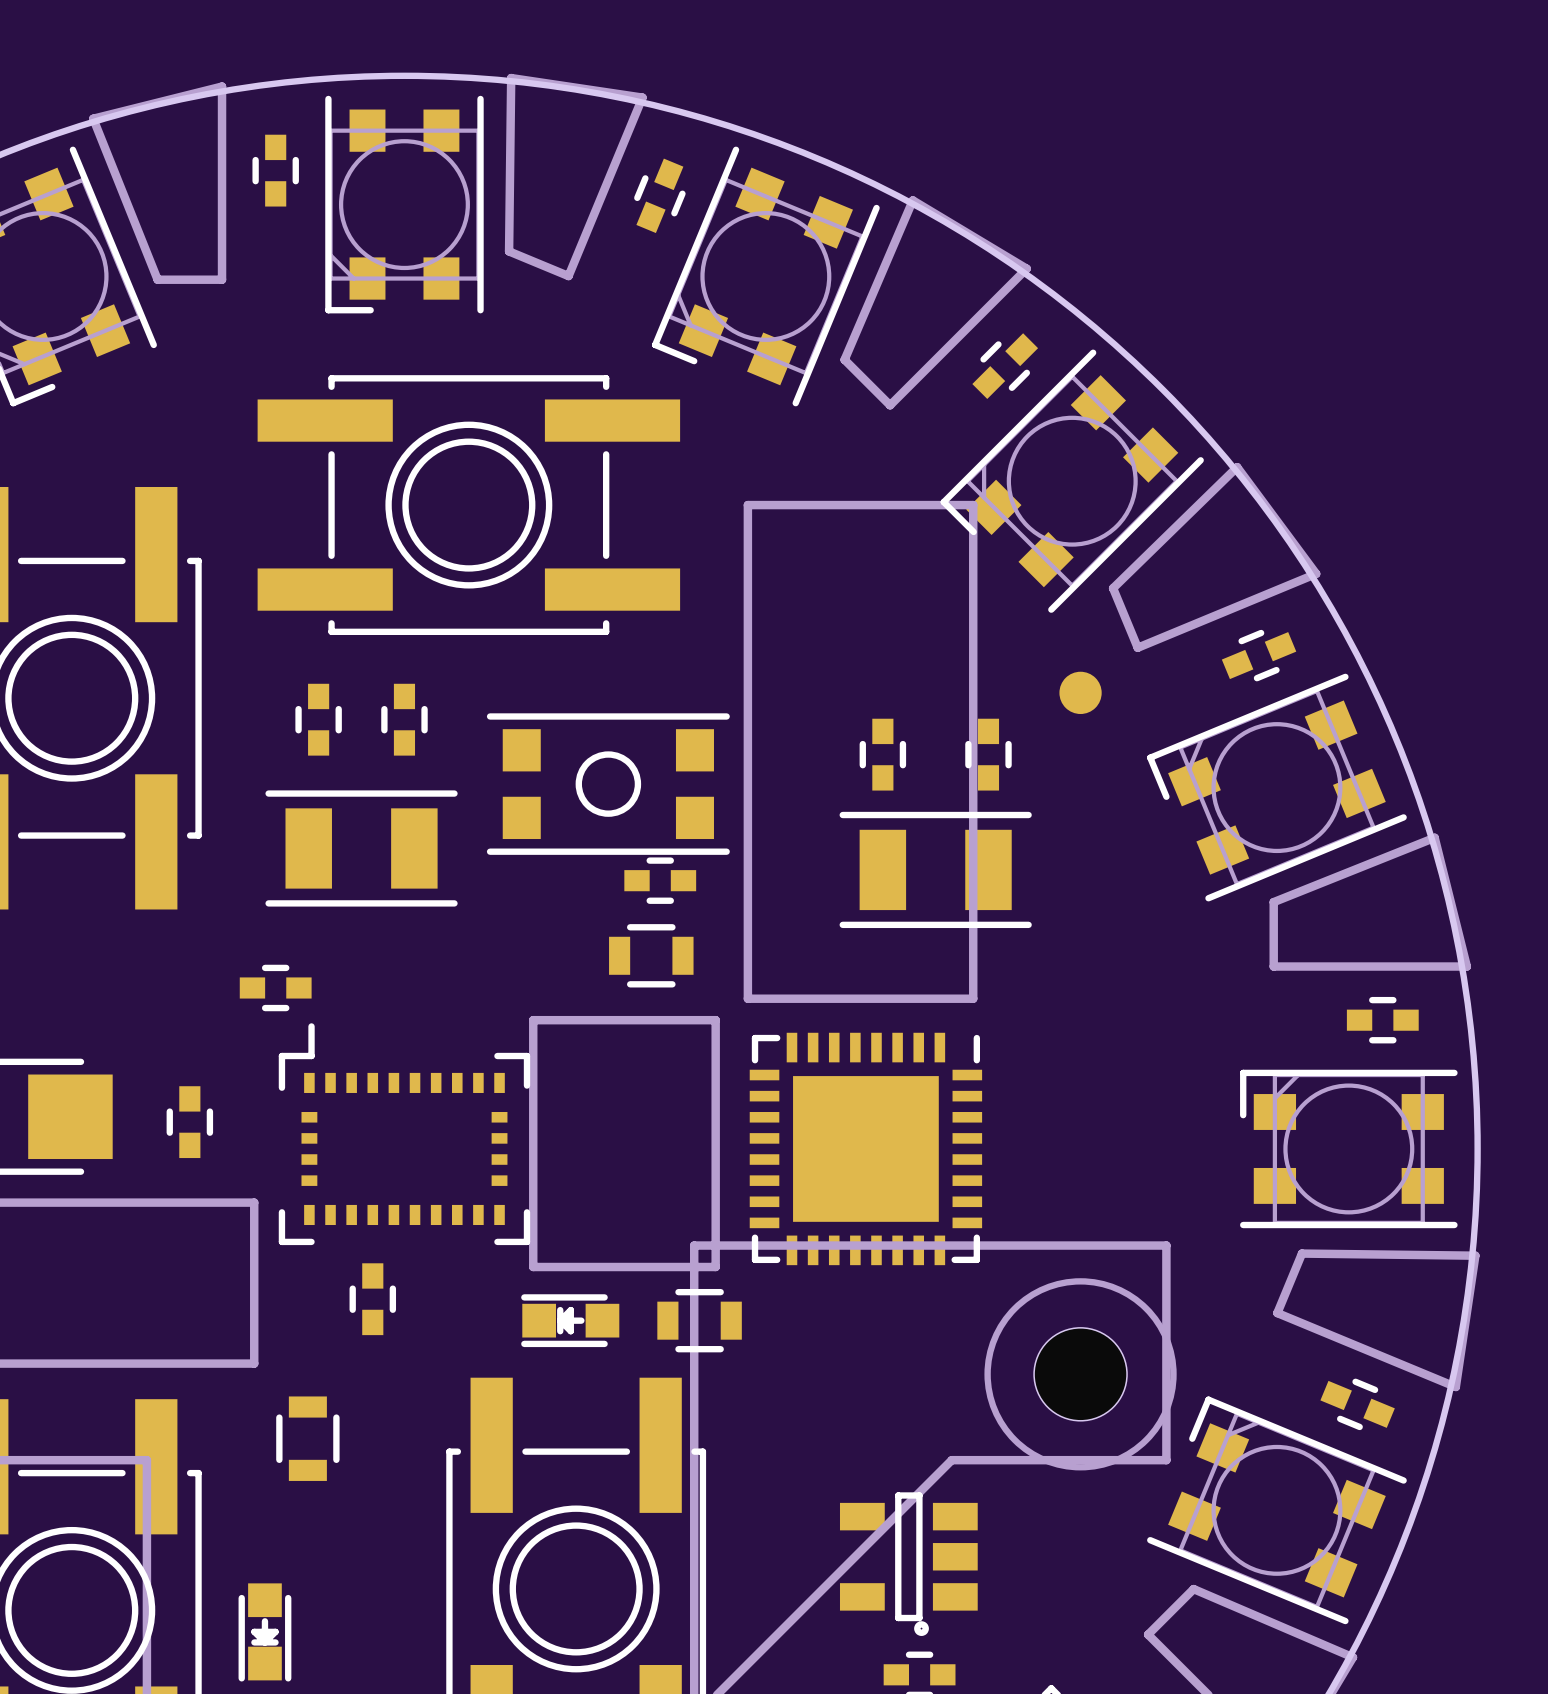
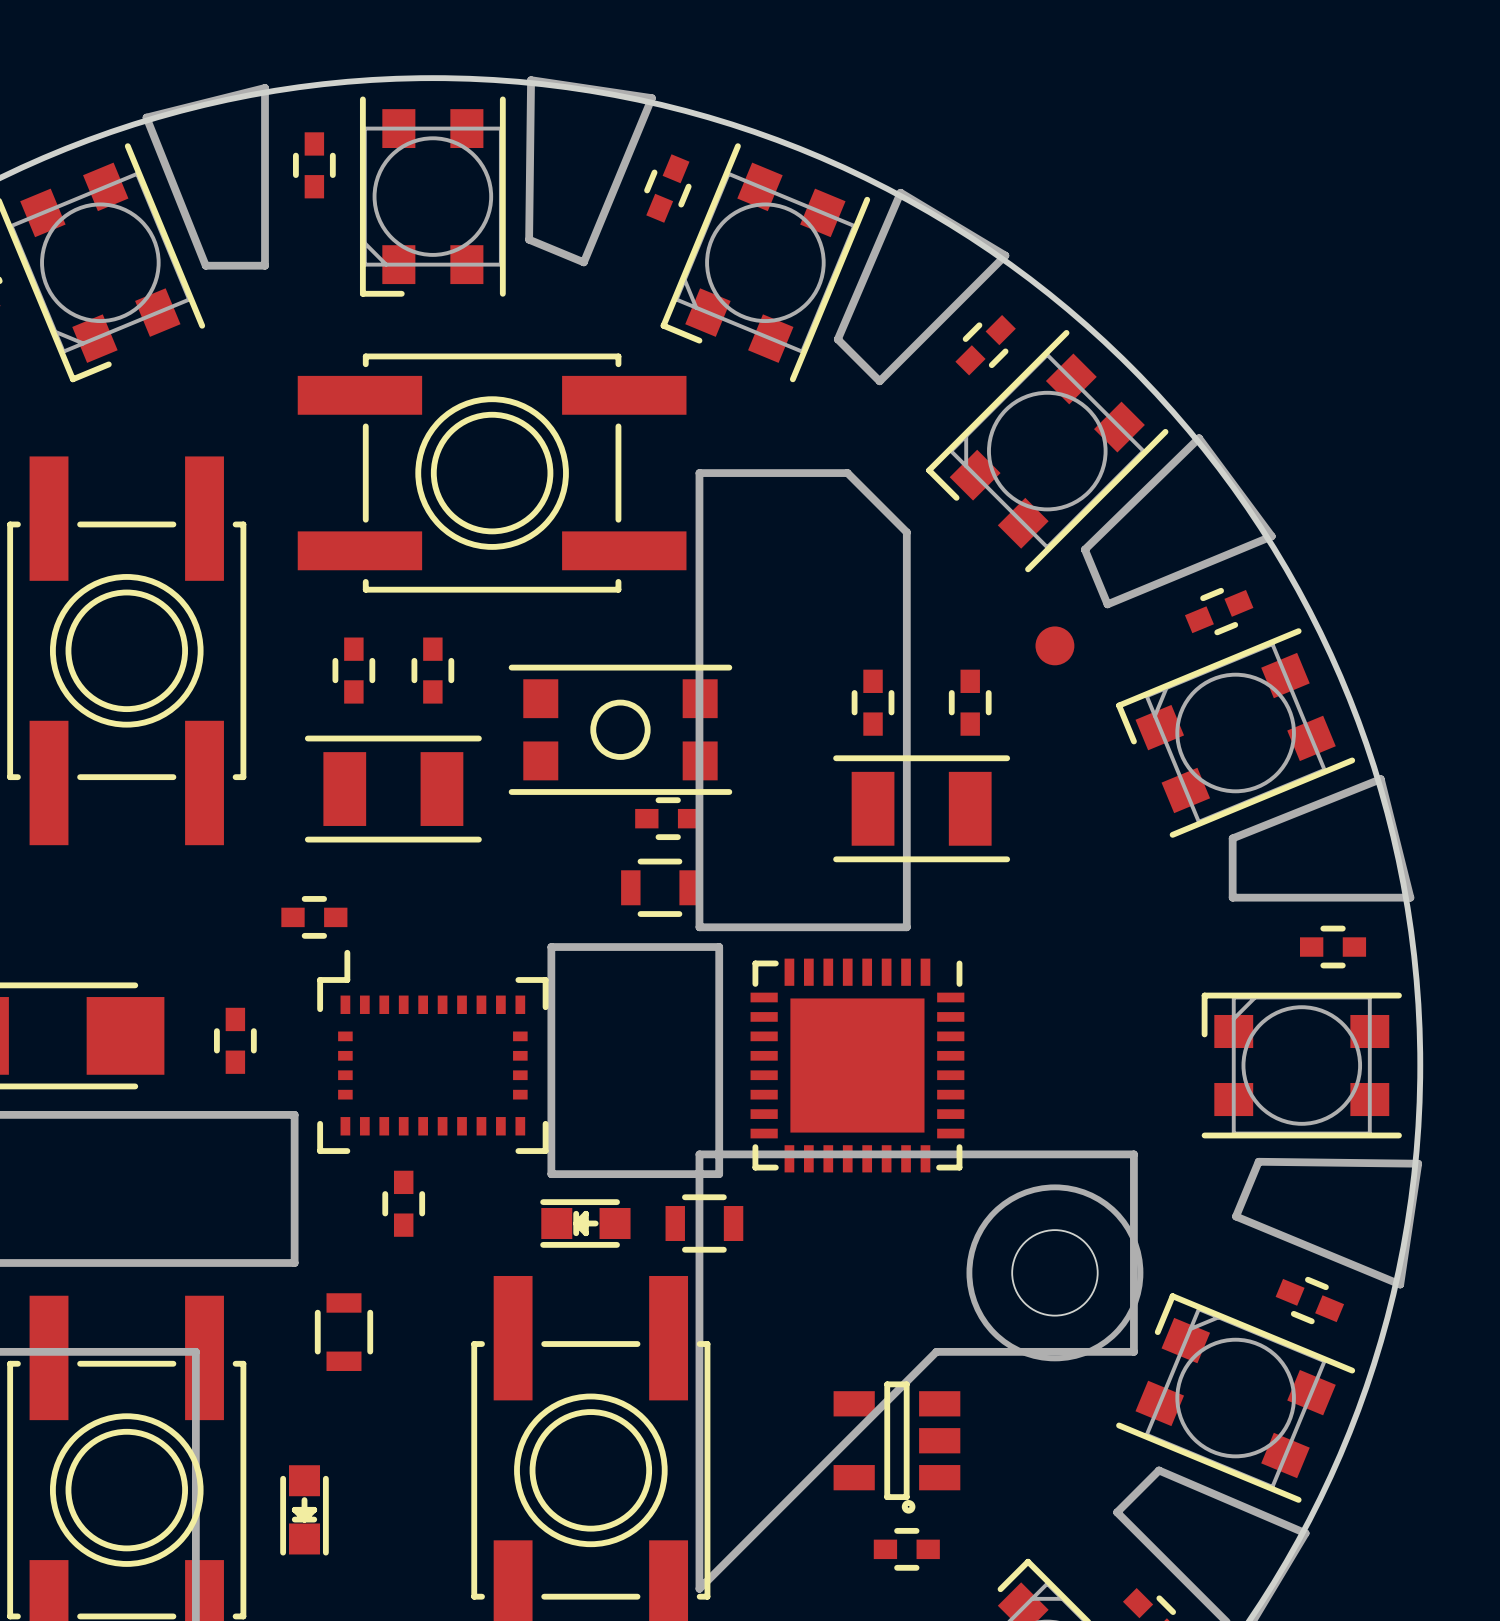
line: (747, 505) (747, 998) -> (748, 473) (699, 473) (699, 927) (748, 927)
line: (855, 505) (973, 505) (973, 998) (919, 998) -> (847, 473) (906, 532) (906, 927)

